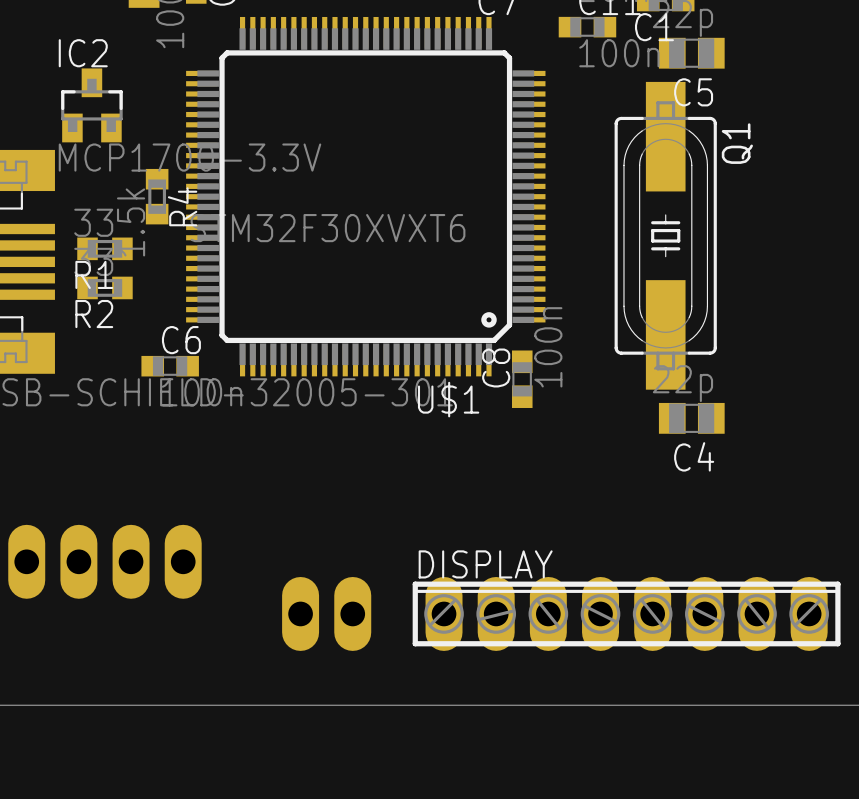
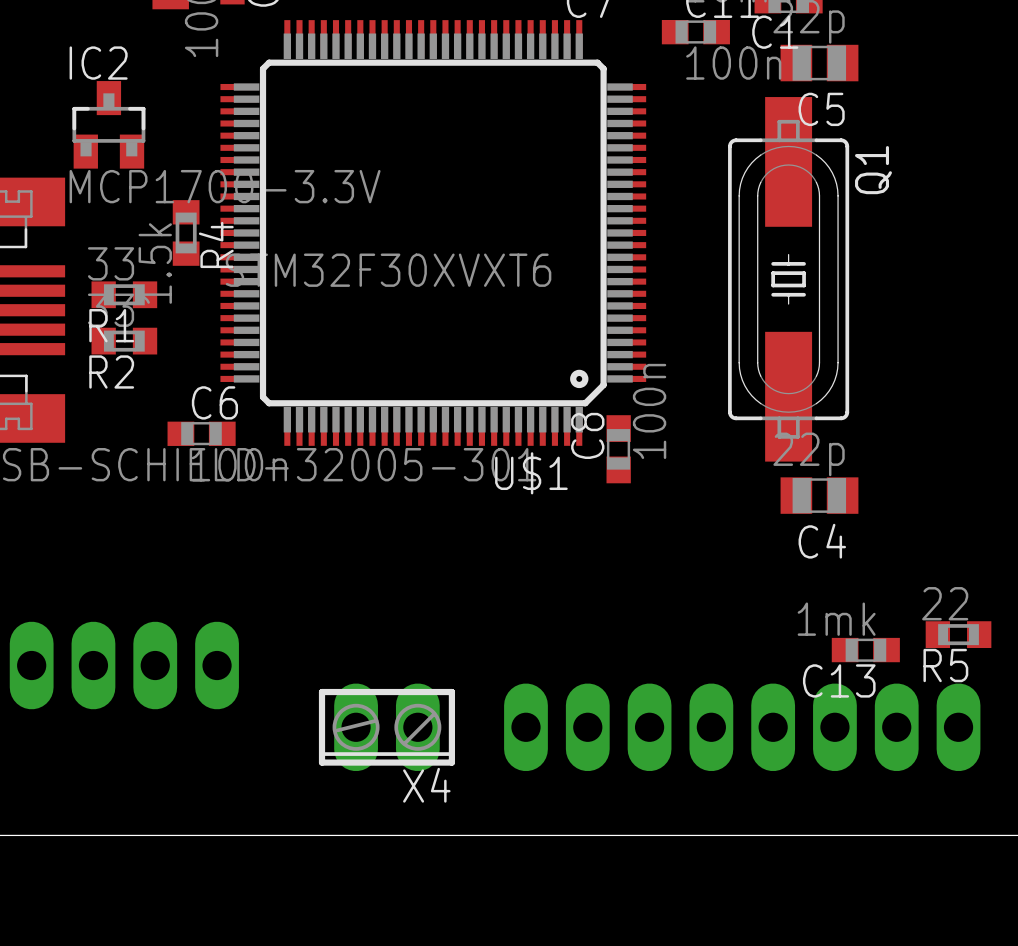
R5: none -> 22 (958, 634)
C13: none -> 1mk (865, 650)
X4 side: bottom (326, 613) -> top (386, 727)
DISPLAY side: top (626, 613) -> bottom (742, 727)

